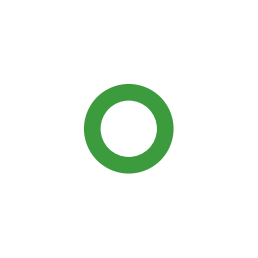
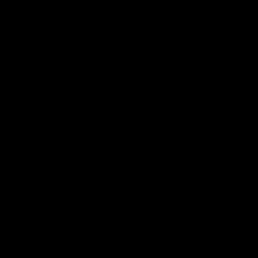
part: (128, 128) -> none

